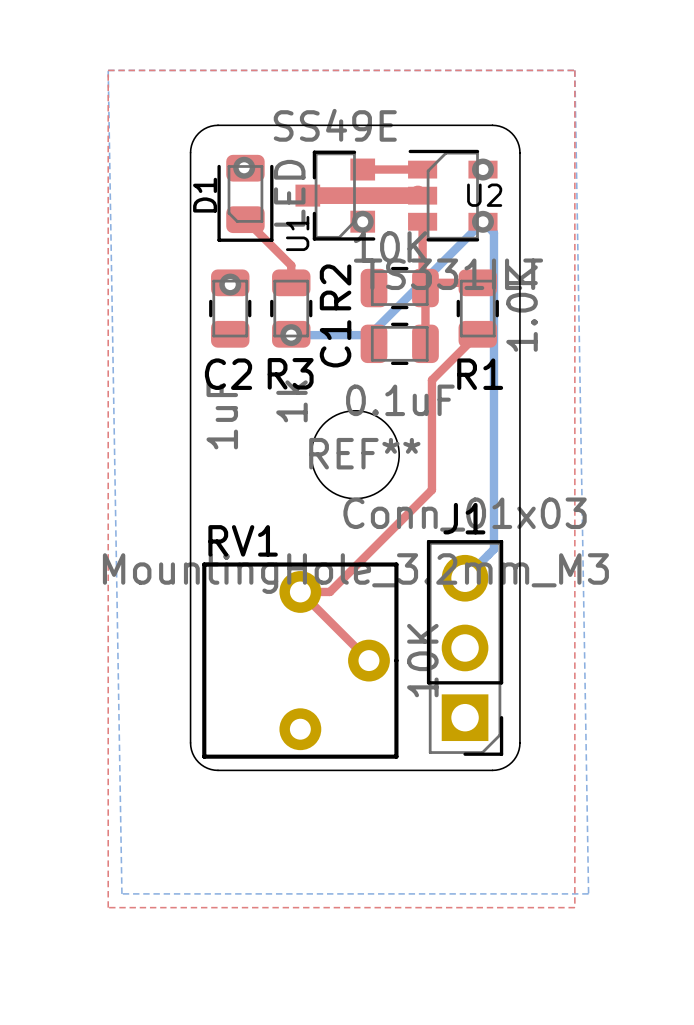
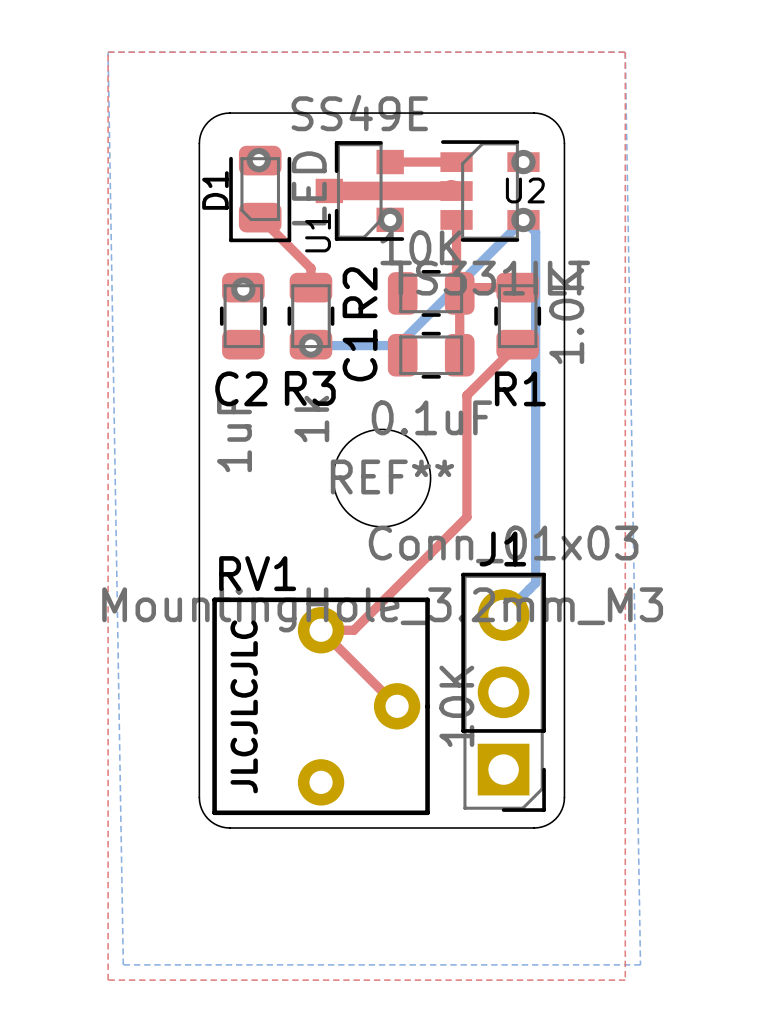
text: none -> JLCJLCJLC (244, 706)

